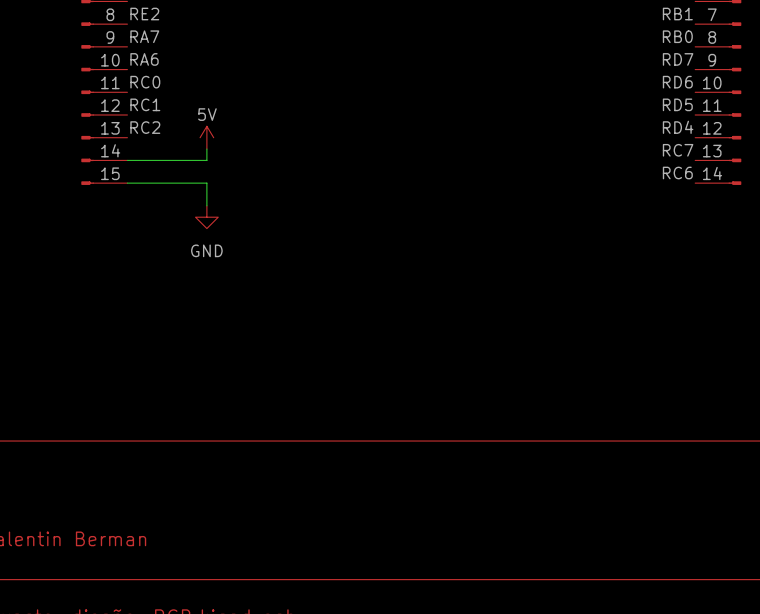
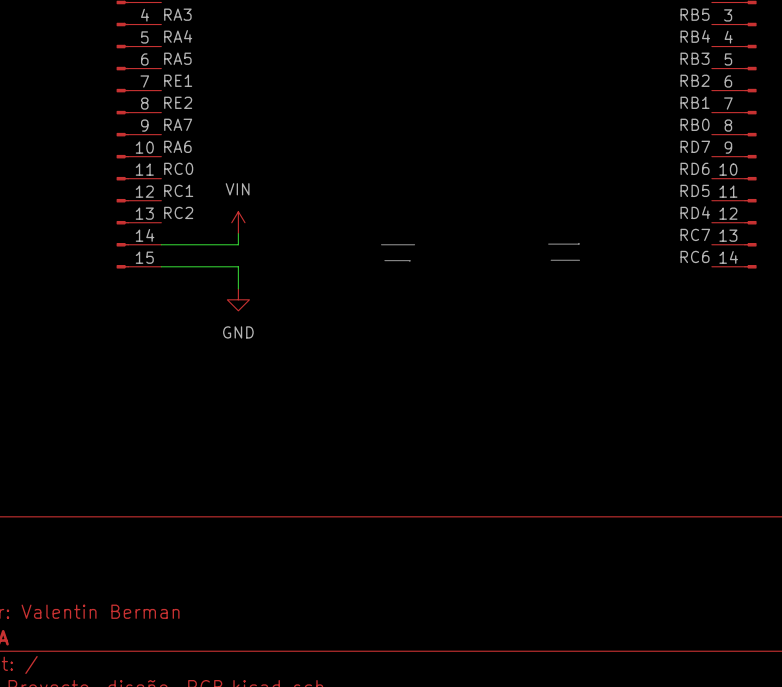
power symbol: 5V (206, 137) -> VIN (238, 222)
line: none -> (579, 243) (548, 244)
line: none -> (381, 244) (414, 244)
line: none -> (384, 260) (409, 261)
line: none -> (551, 260) (579, 260)

